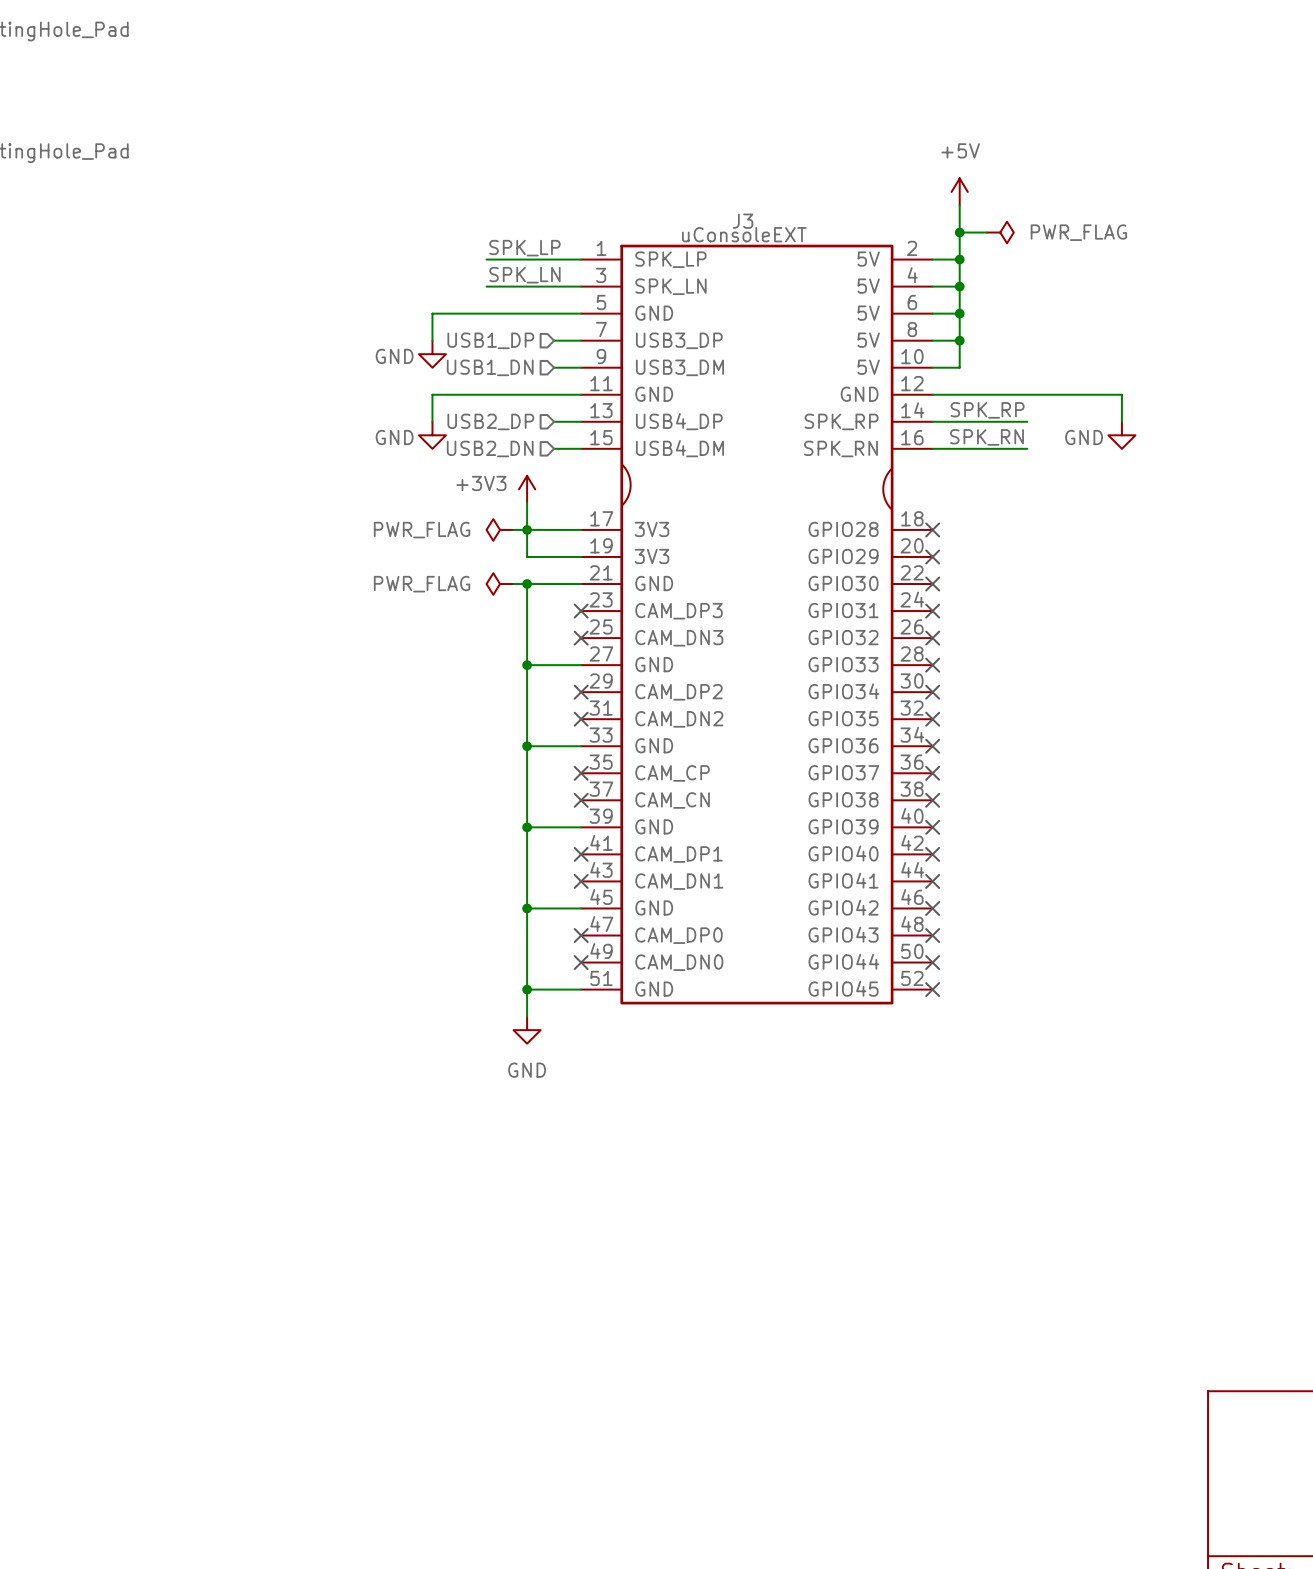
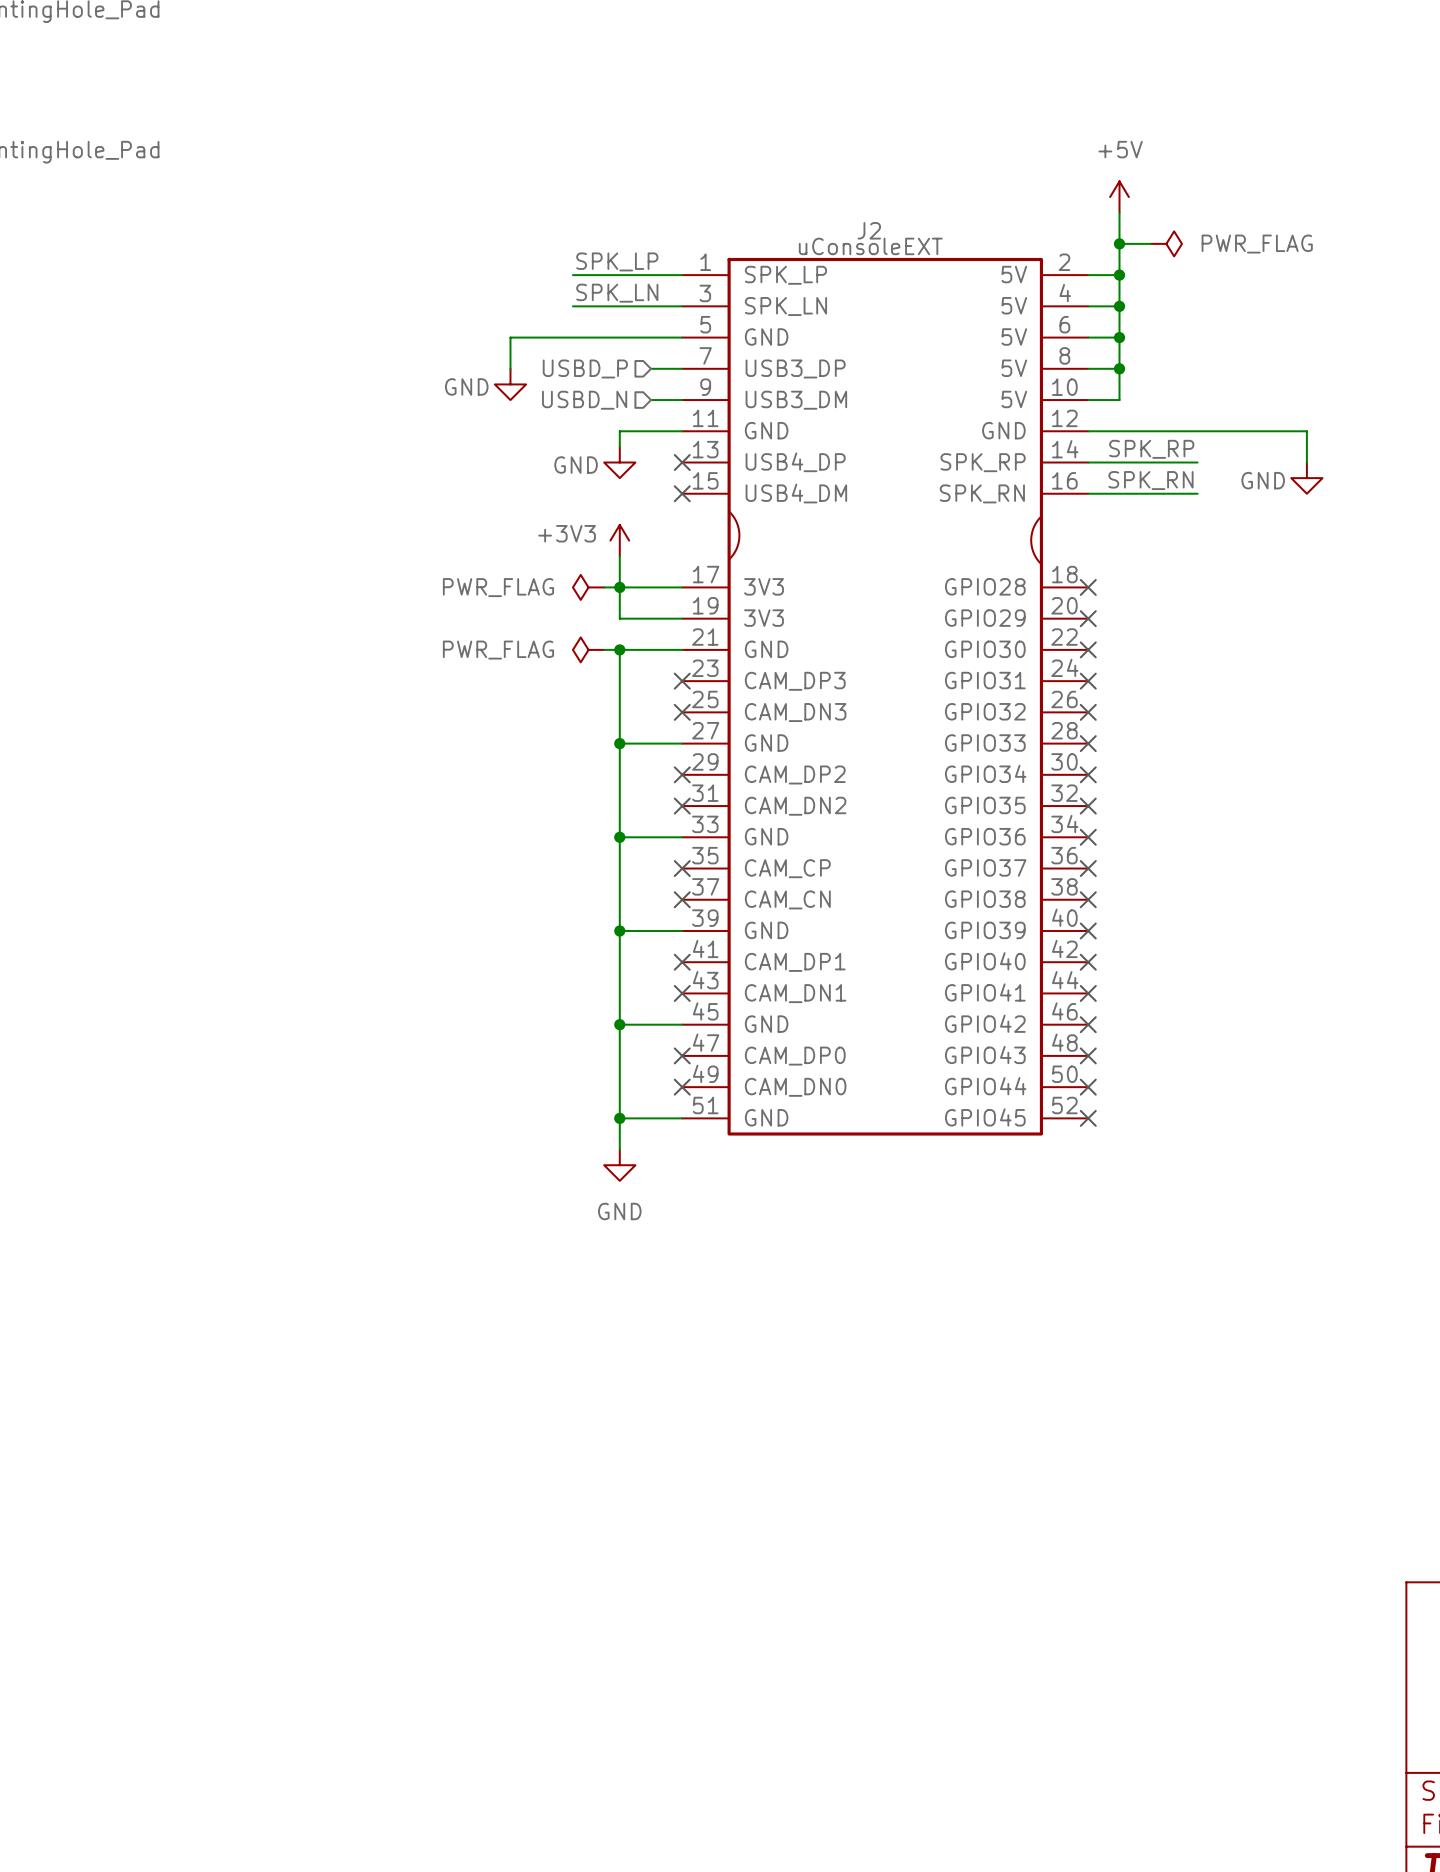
J3 name: J3 (743, 221) -> J2 (869, 230)
hierarchical label: USB1_DP (490, 340) -> USBD_P (585, 368)
hierarchical label: USB1_DN (490, 367) -> USBD_N (584, 400)
wire: (527, 394) (432, 394) (432, 421) -> (619, 431) (619, 446)
hierarchical label: USB2_DP (490, 421) -> none
wire: (554, 421) (581, 421) -> none
no-connect mark: none -> (682, 462)
power symbol position: GND (432, 435) -> GND (619, 462)
hierarchical label: USB2_DN (490, 448) -> none
wire: (554, 448) (581, 448) -> none
no-connect mark: none -> (682, 493)

